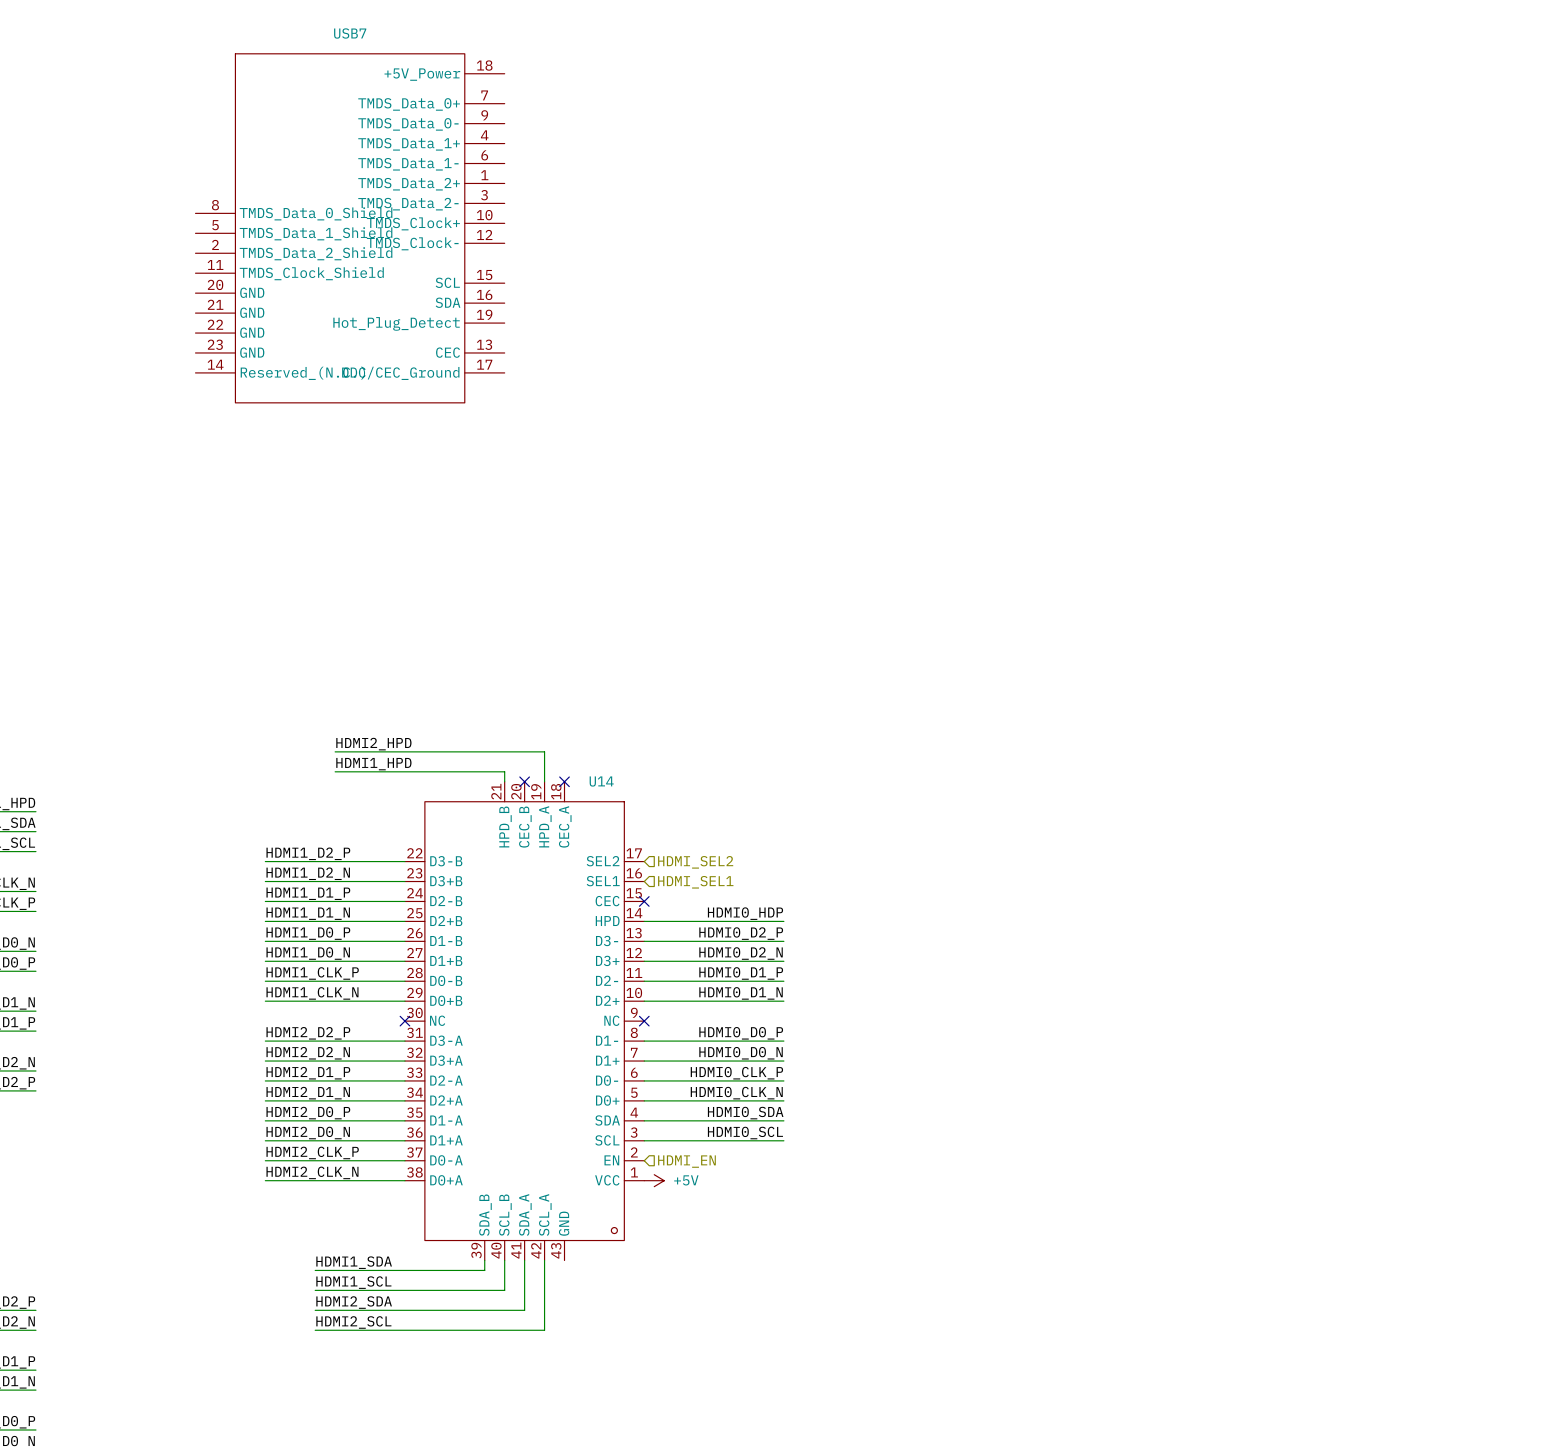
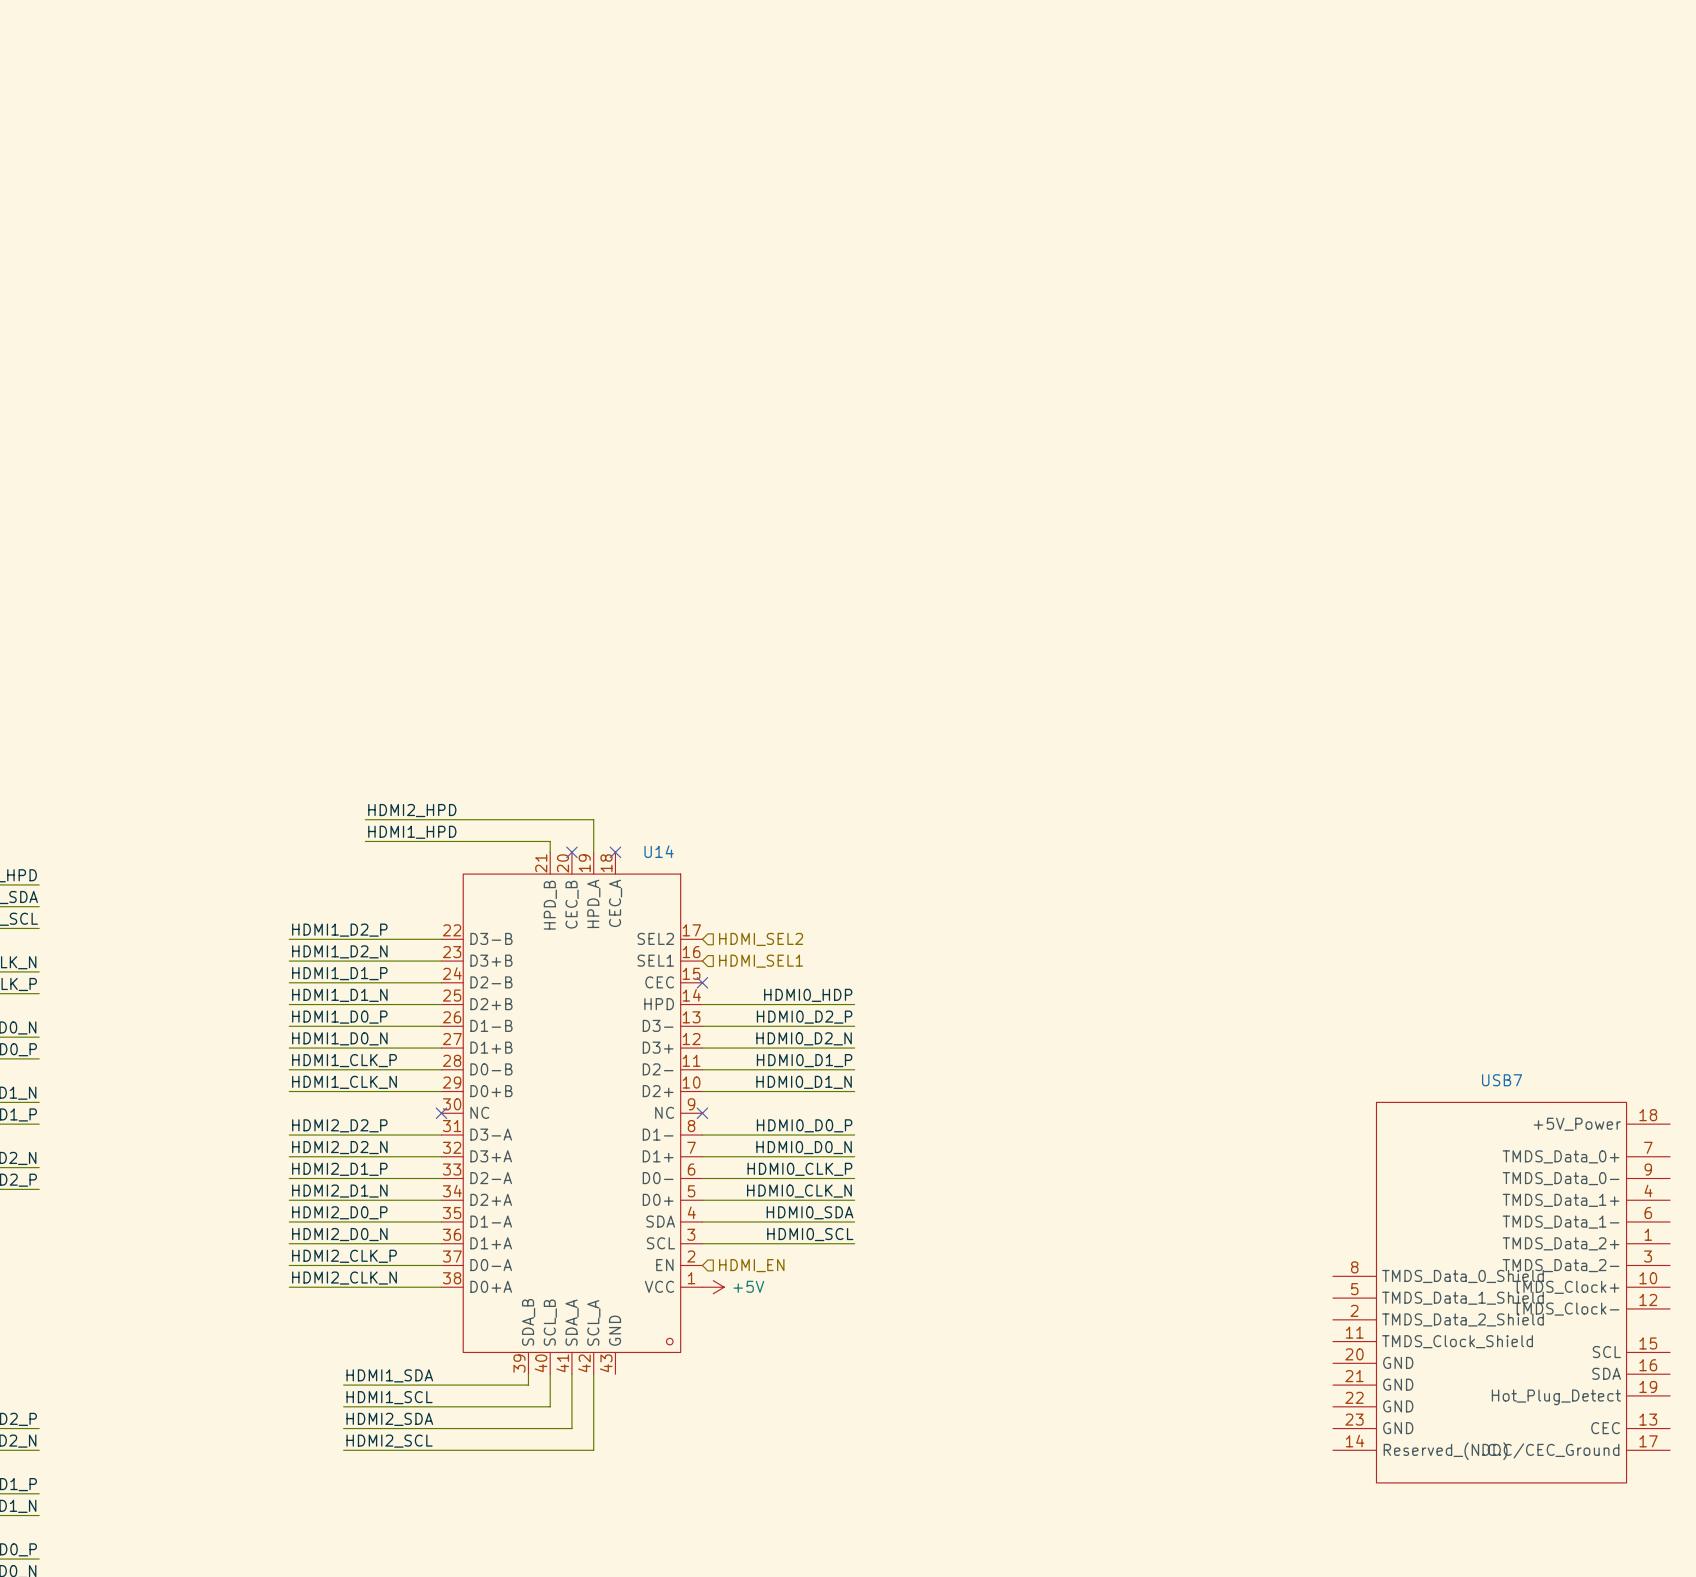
USB7 position: (350, 228) -> (1501, 1292)

